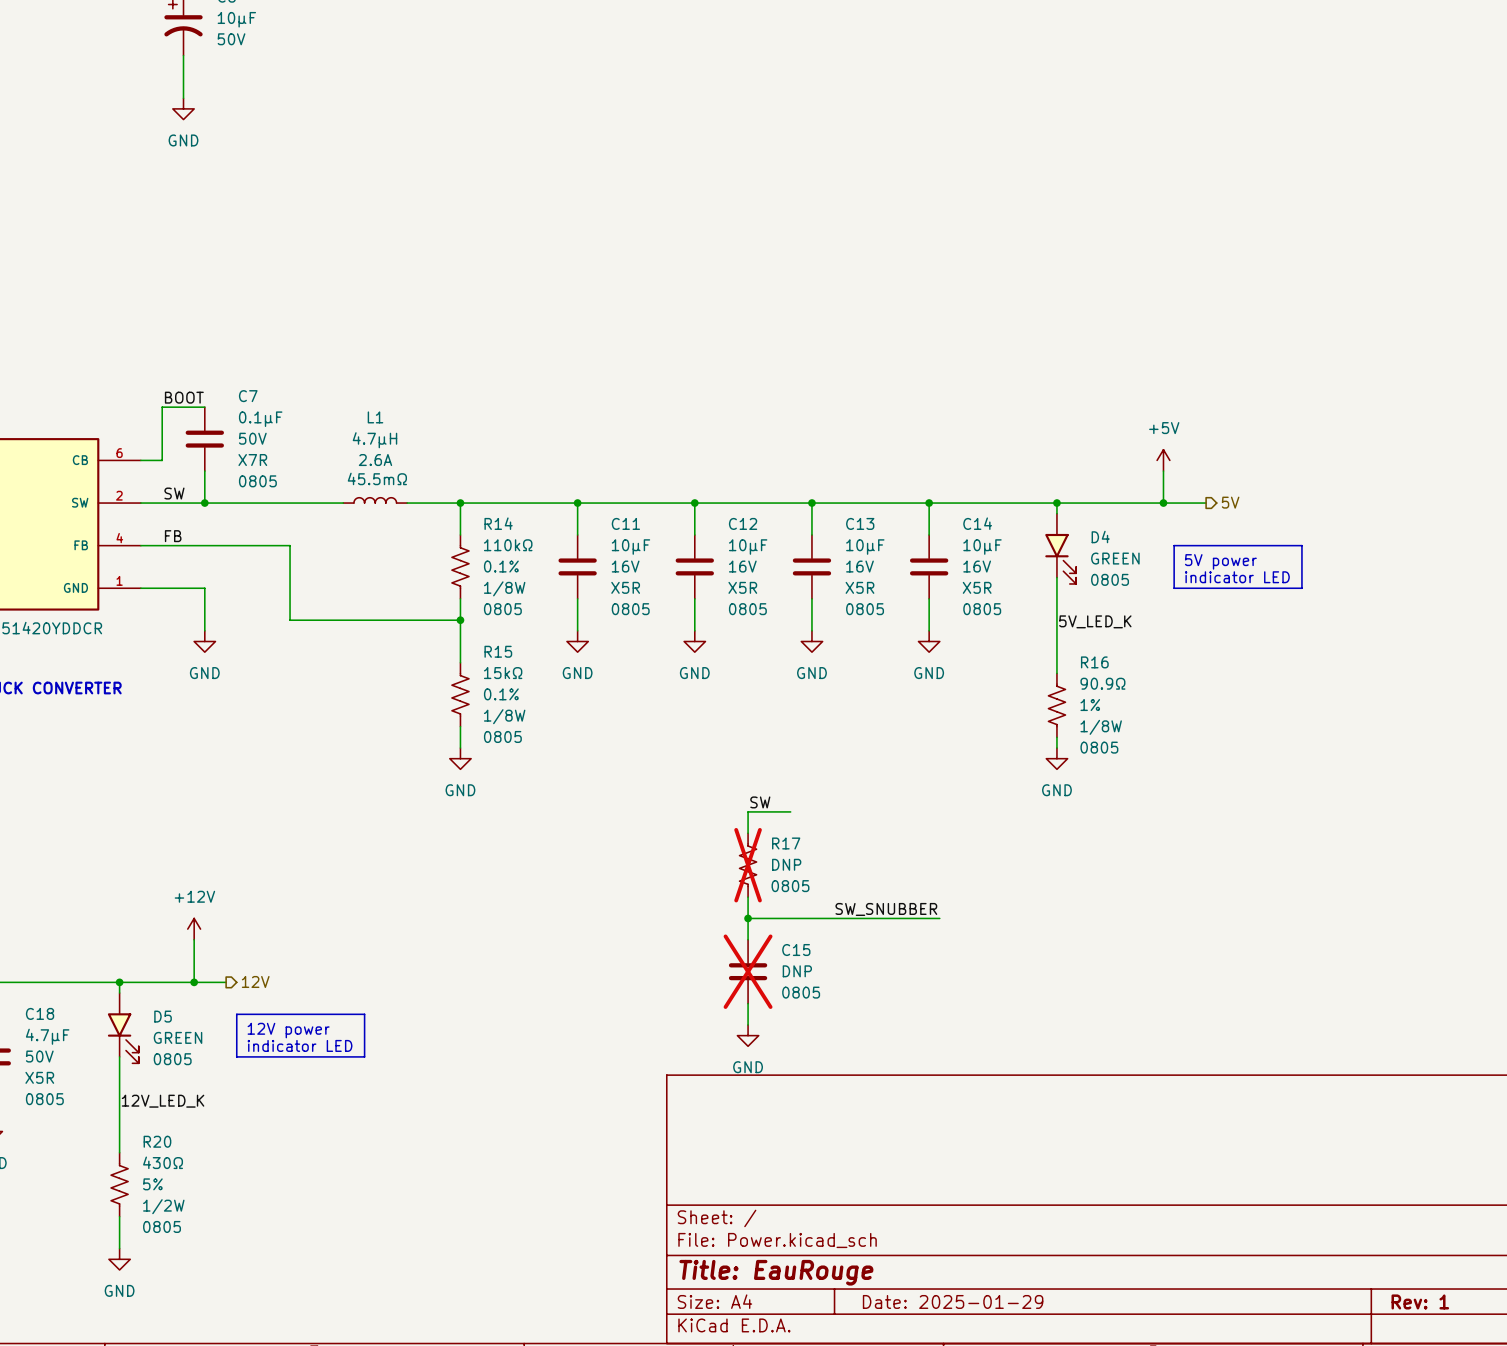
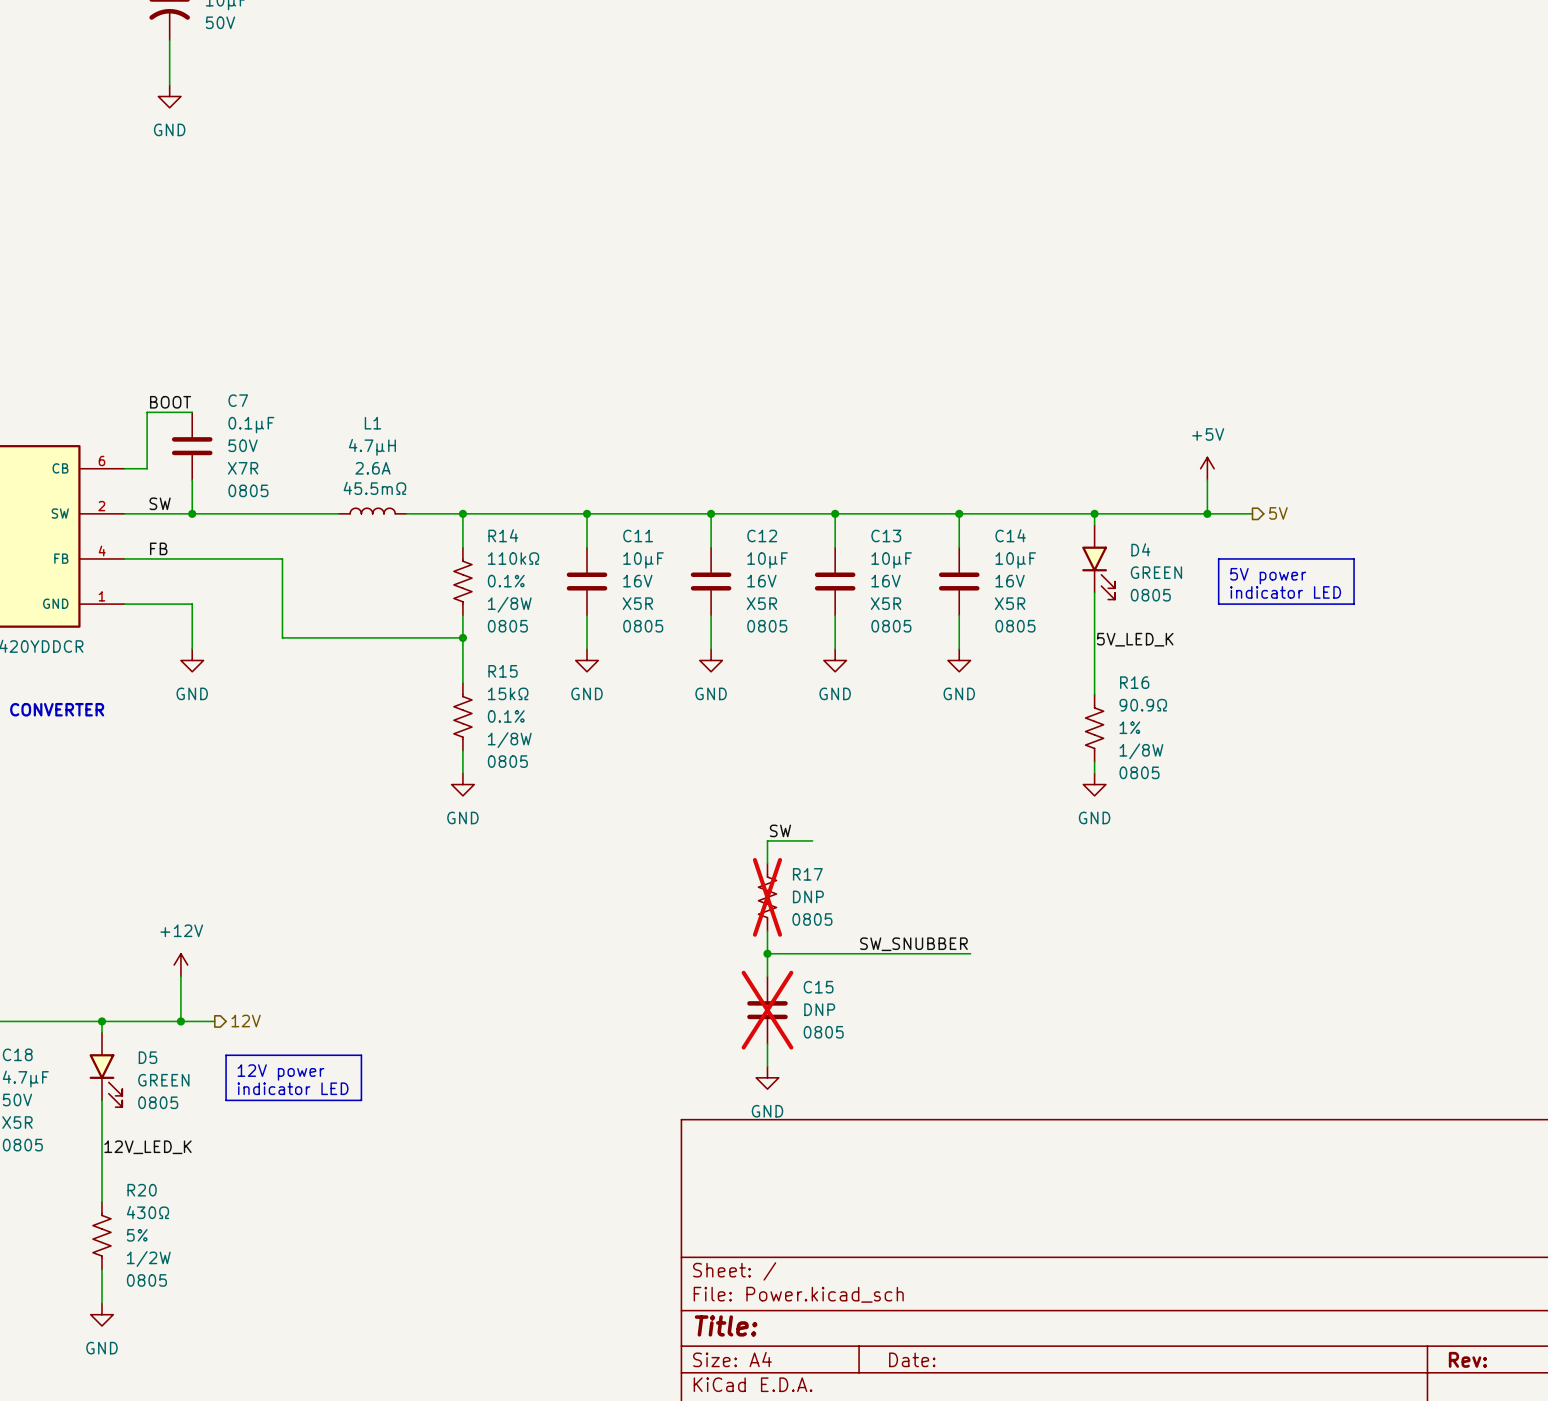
title block: Title: EauRouge (776, 1272) -> Title: (726, 1325)
title block: Date: 2025-01-29 (953, 1301) -> Date: (912, 1359)
title block: Rev: 1 (1420, 1301) -> Rev: (1467, 1359)

